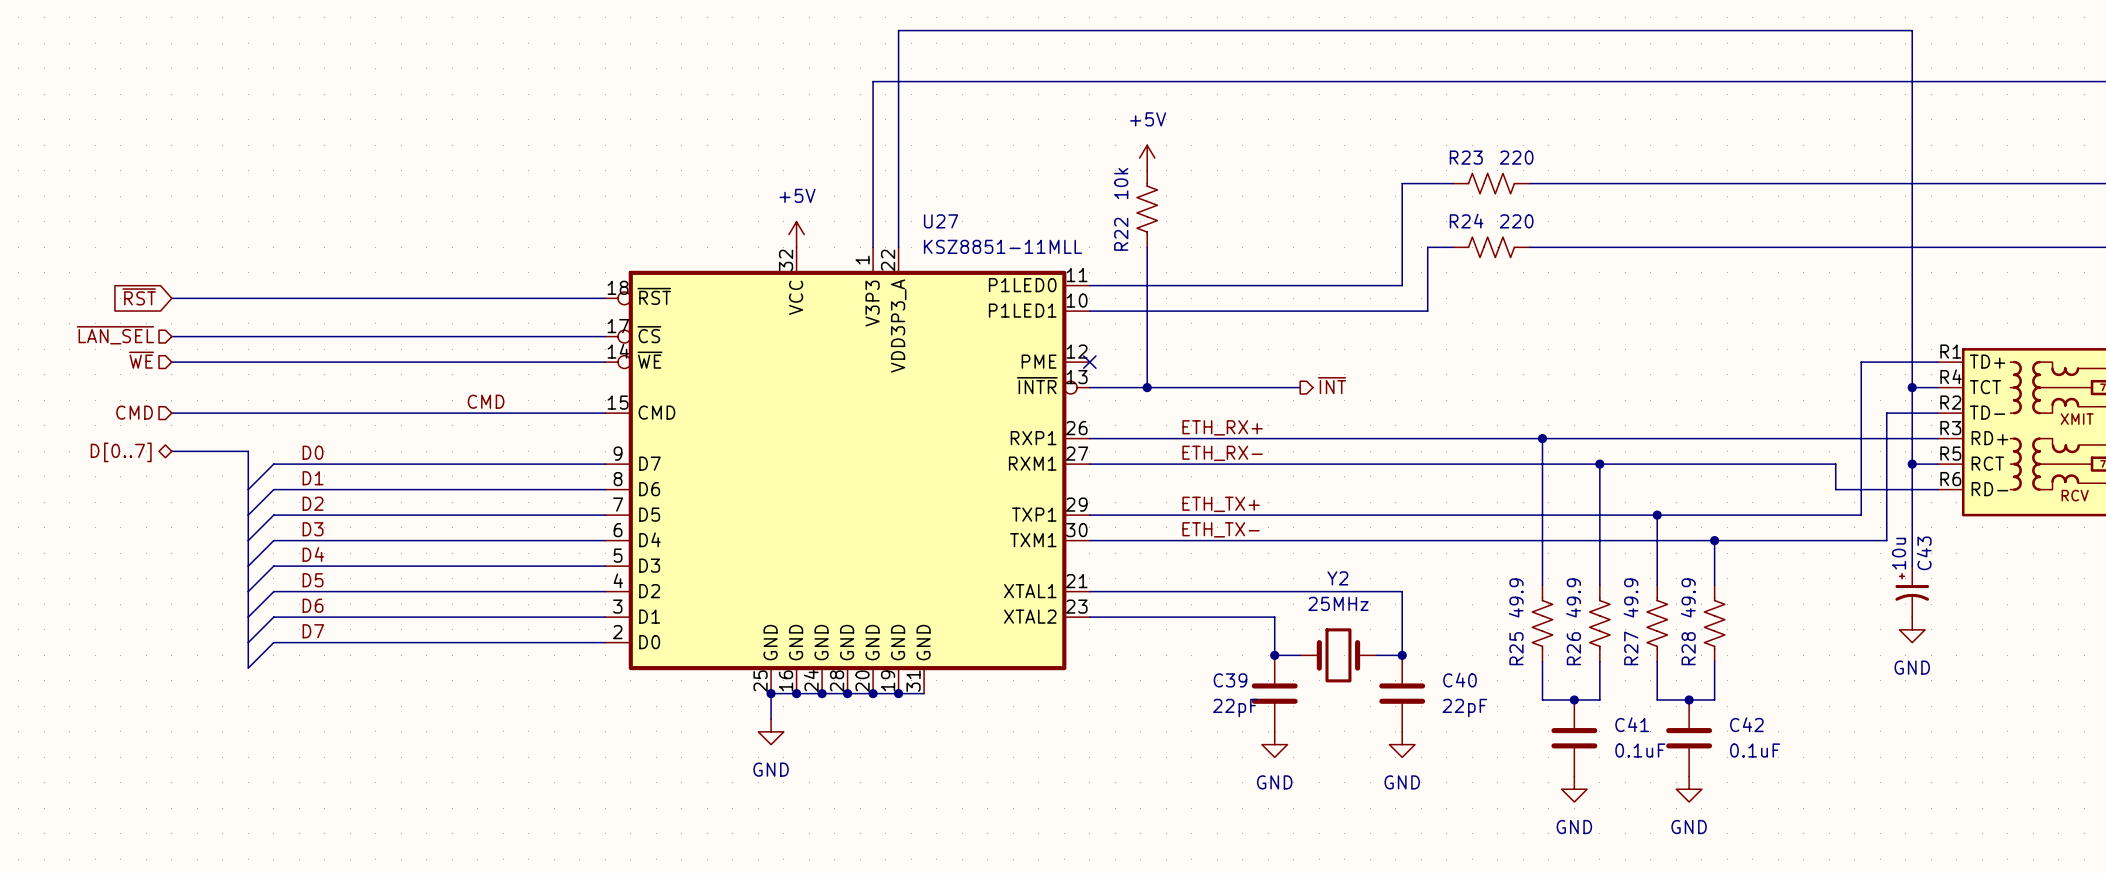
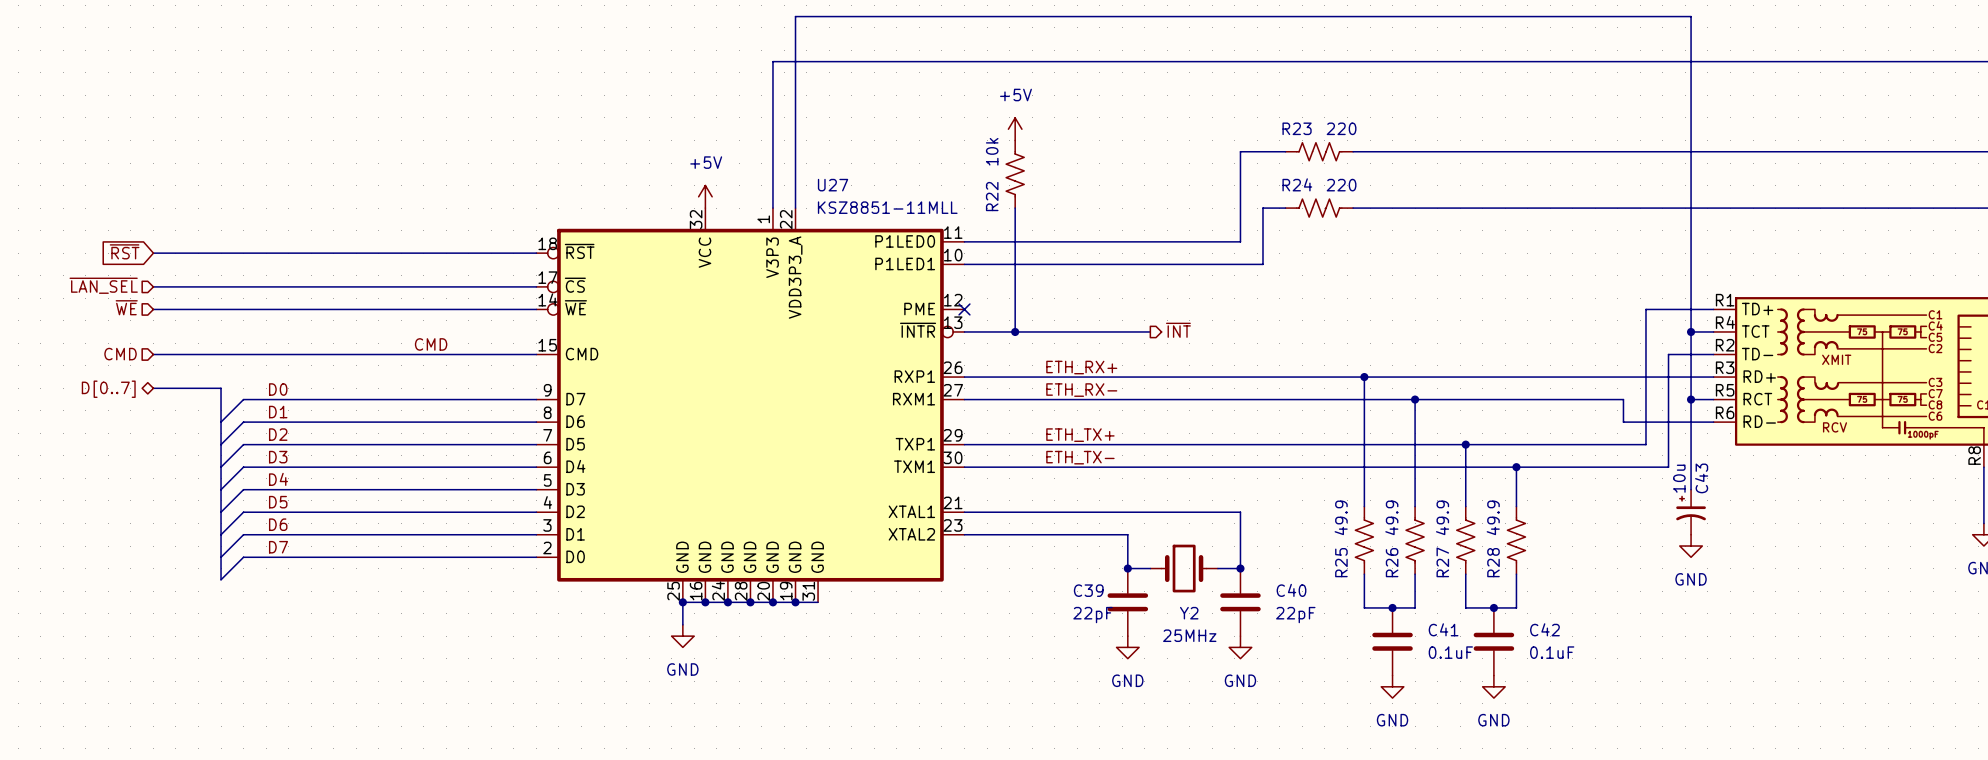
Y2 name position: Y2 (1337, 578) -> Y2 (1189, 613)
Y2 value position: 25MHz (1338, 603) -> 25MHz (1189, 635)

